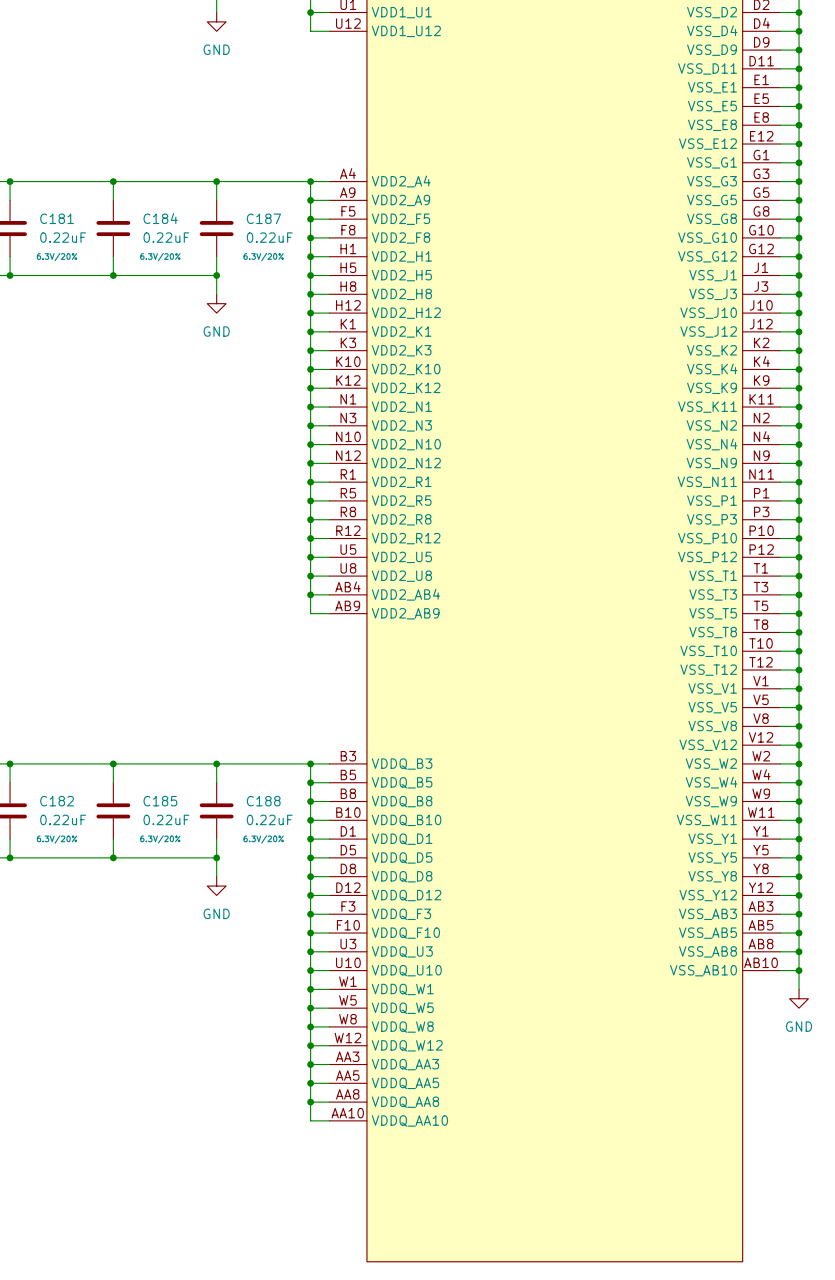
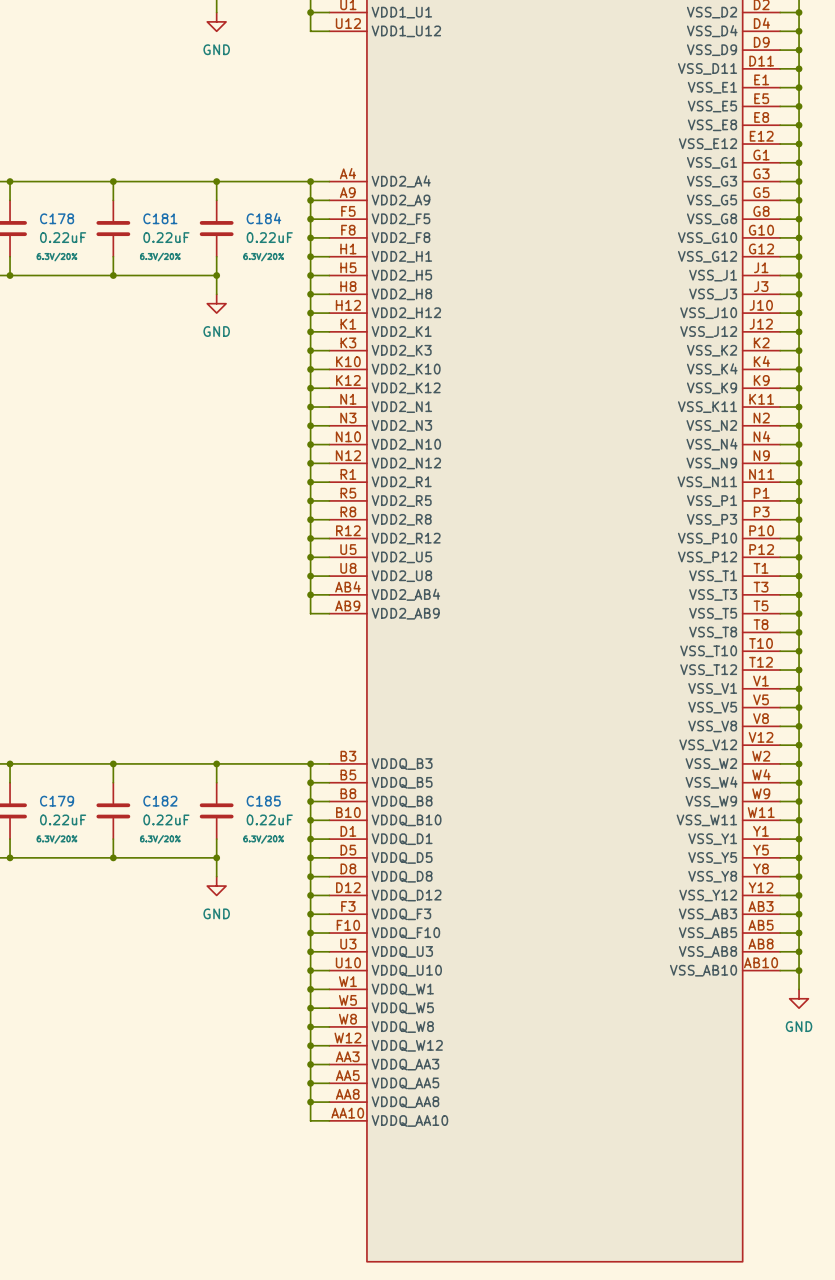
C181 name: C181 (57, 218) -> C178 (57, 218)
C184 name: C184 (160, 218) -> C181 (160, 218)
C187 name: C187 (263, 218) -> C184 (263, 218)
C182 name: C182 (57, 801) -> C179 (57, 801)
C185 name: C185 (160, 801) -> C182 (160, 801)
C188 name: C188 (263, 801) -> C185 (263, 801)

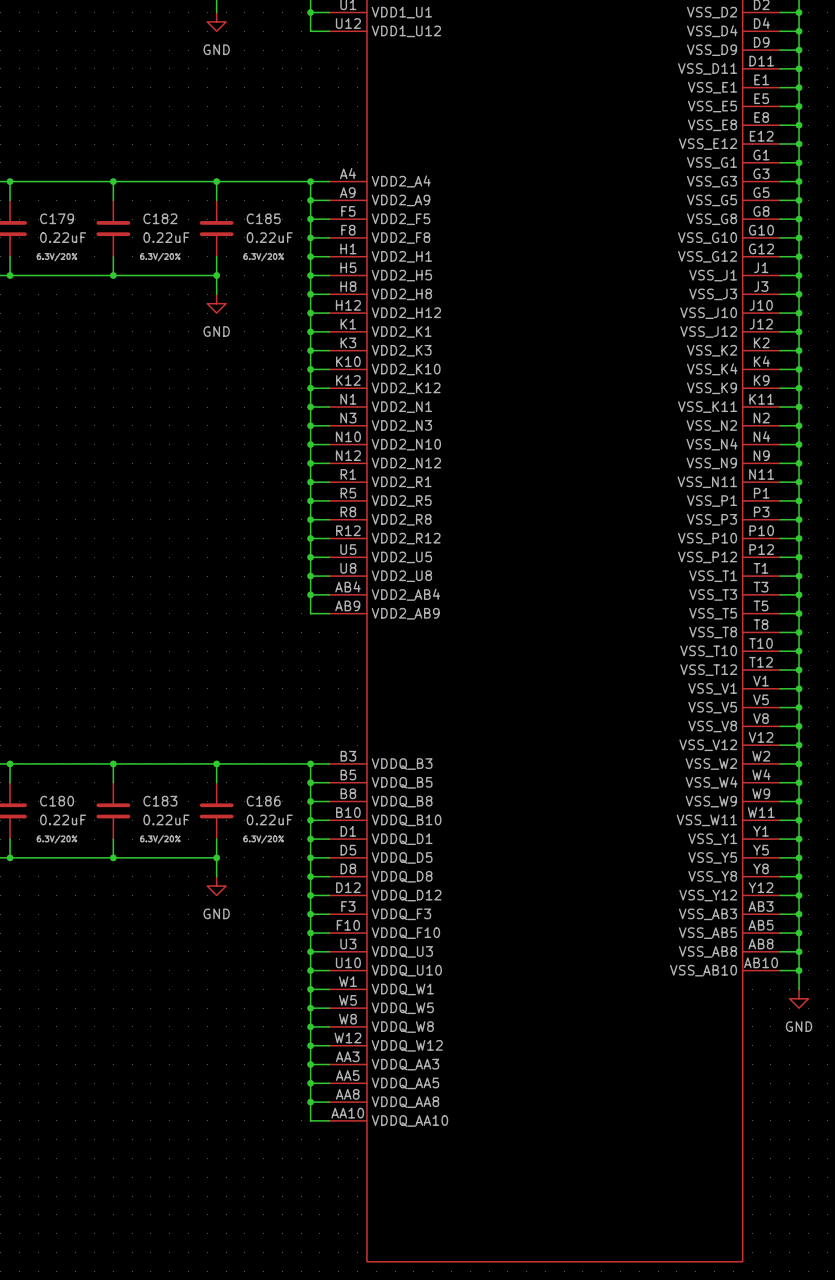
C178 name: C178 (57, 218) -> C179 (57, 218)
C181 name: C181 (160, 218) -> C182 (160, 218)
C184 name: C184 (263, 218) -> C185 (263, 218)
C179 name: C179 (57, 801) -> C180 (57, 801)
C182 name: C182 (160, 801) -> C183 (160, 801)
C185 name: C185 (263, 801) -> C186 (263, 801)

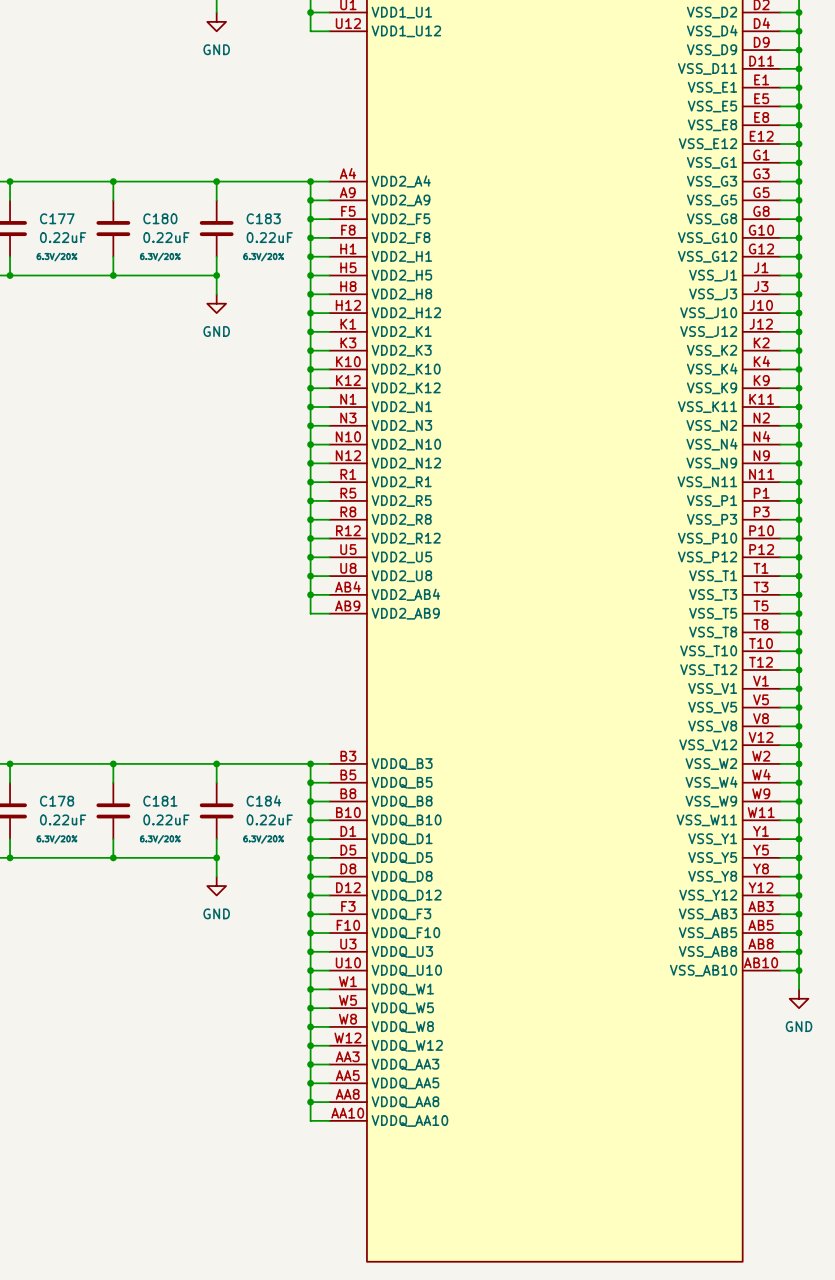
C179 name: C179 (57, 218) -> C177 (57, 218)
C182 name: C182 (160, 218) -> C180 (160, 218)
C185 name: C185 (263, 218) -> C183 (263, 218)
C180 name: C180 (57, 801) -> C178 (57, 801)
C183 name: C183 (160, 801) -> C181 (160, 801)
C186 name: C186 (263, 801) -> C184 (263, 800)

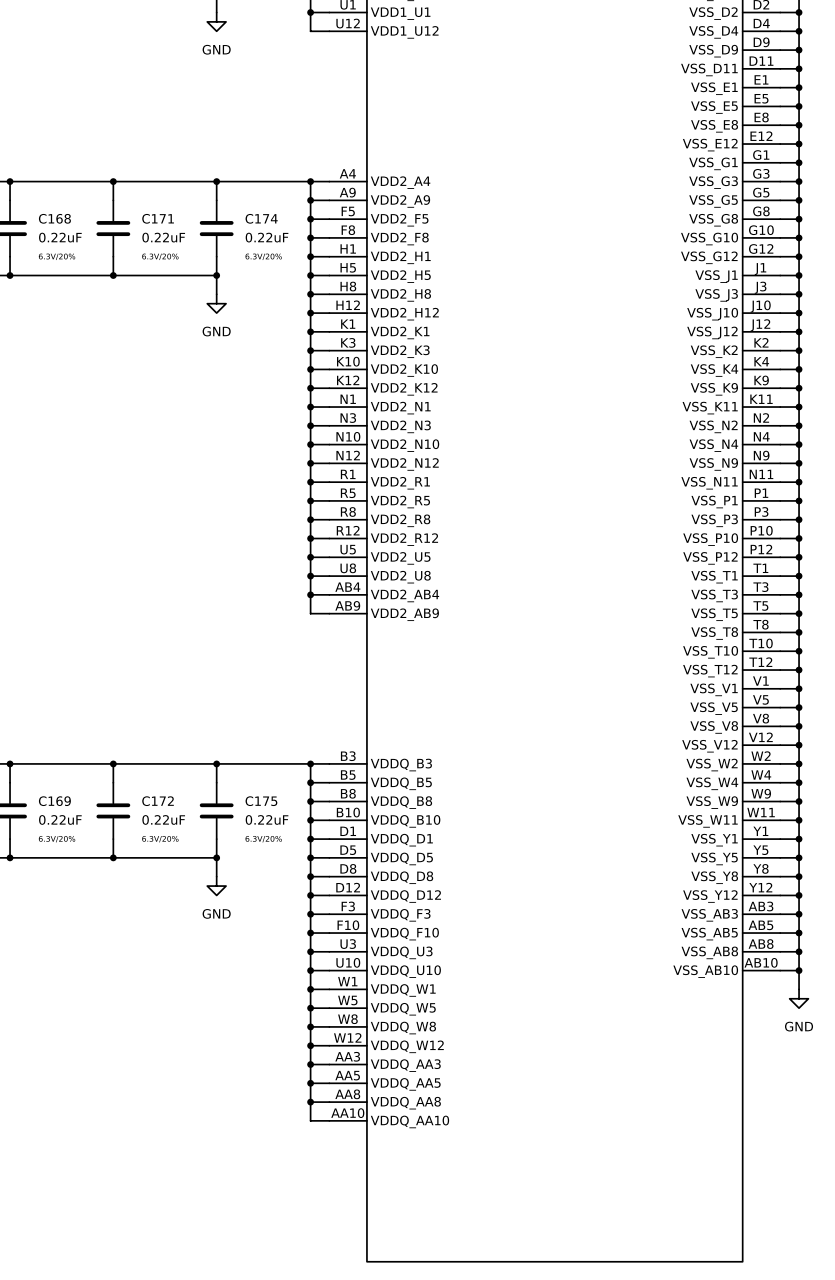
C177 name: C177 (57, 218) -> C168 (54, 218)
C180 name: C180 (160, 218) -> C171 (158, 218)
C183 name: C183 (263, 218) -> C174 (261, 218)
C184 name: C184 (263, 800) -> C175 (261, 801)
C178 name: C178 (57, 801) -> C169 (54, 801)
C181 name: C181 (160, 801) -> C172 (158, 801)

